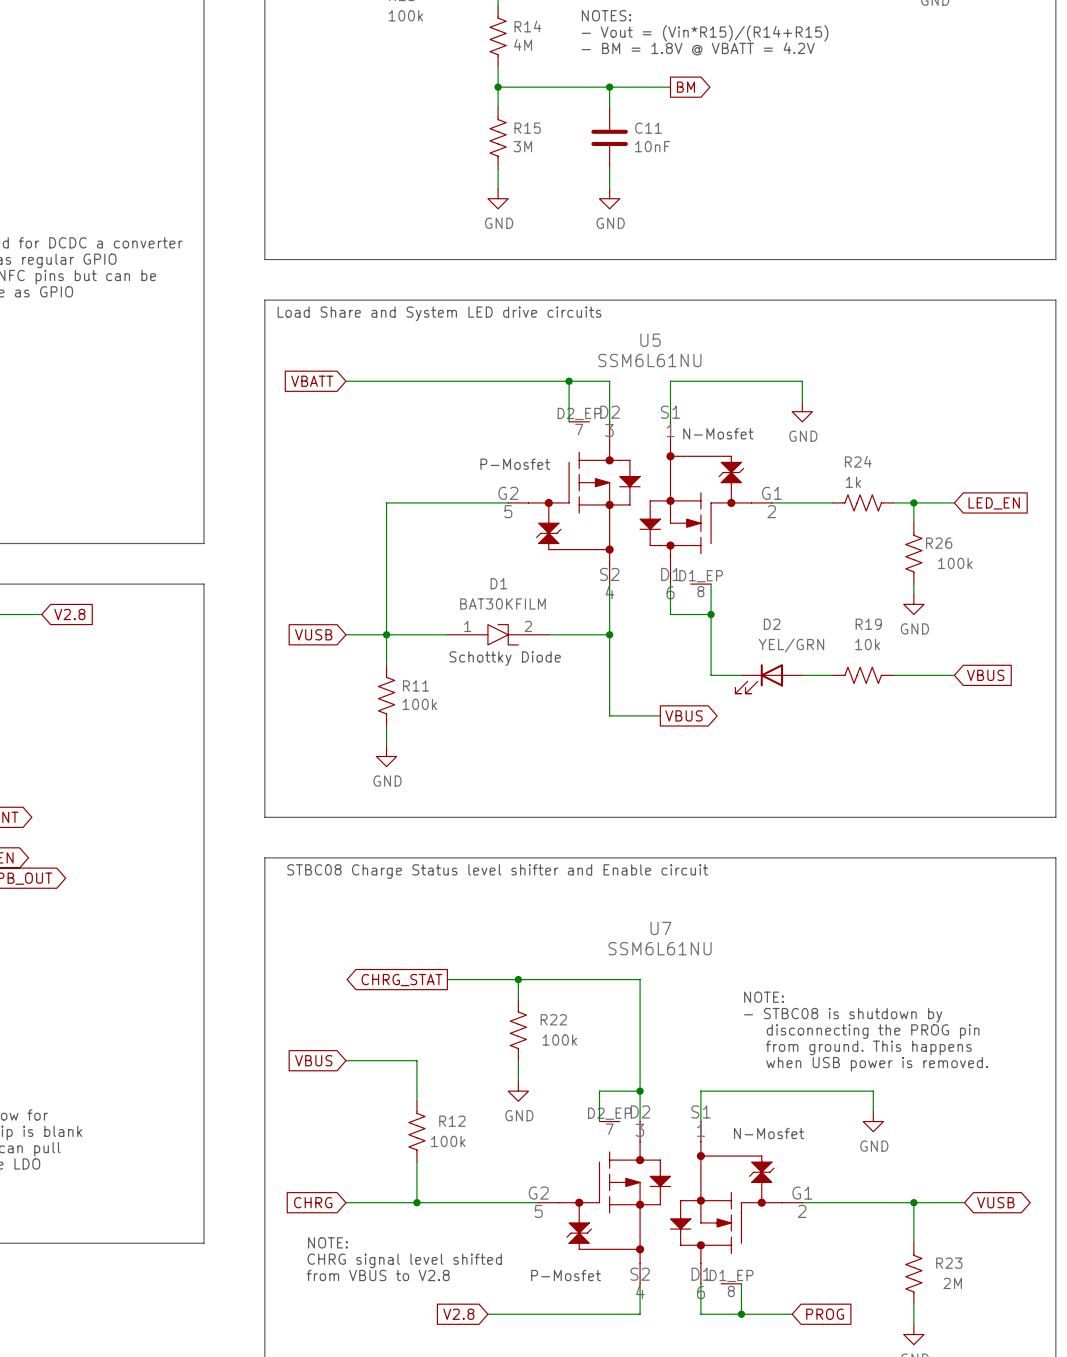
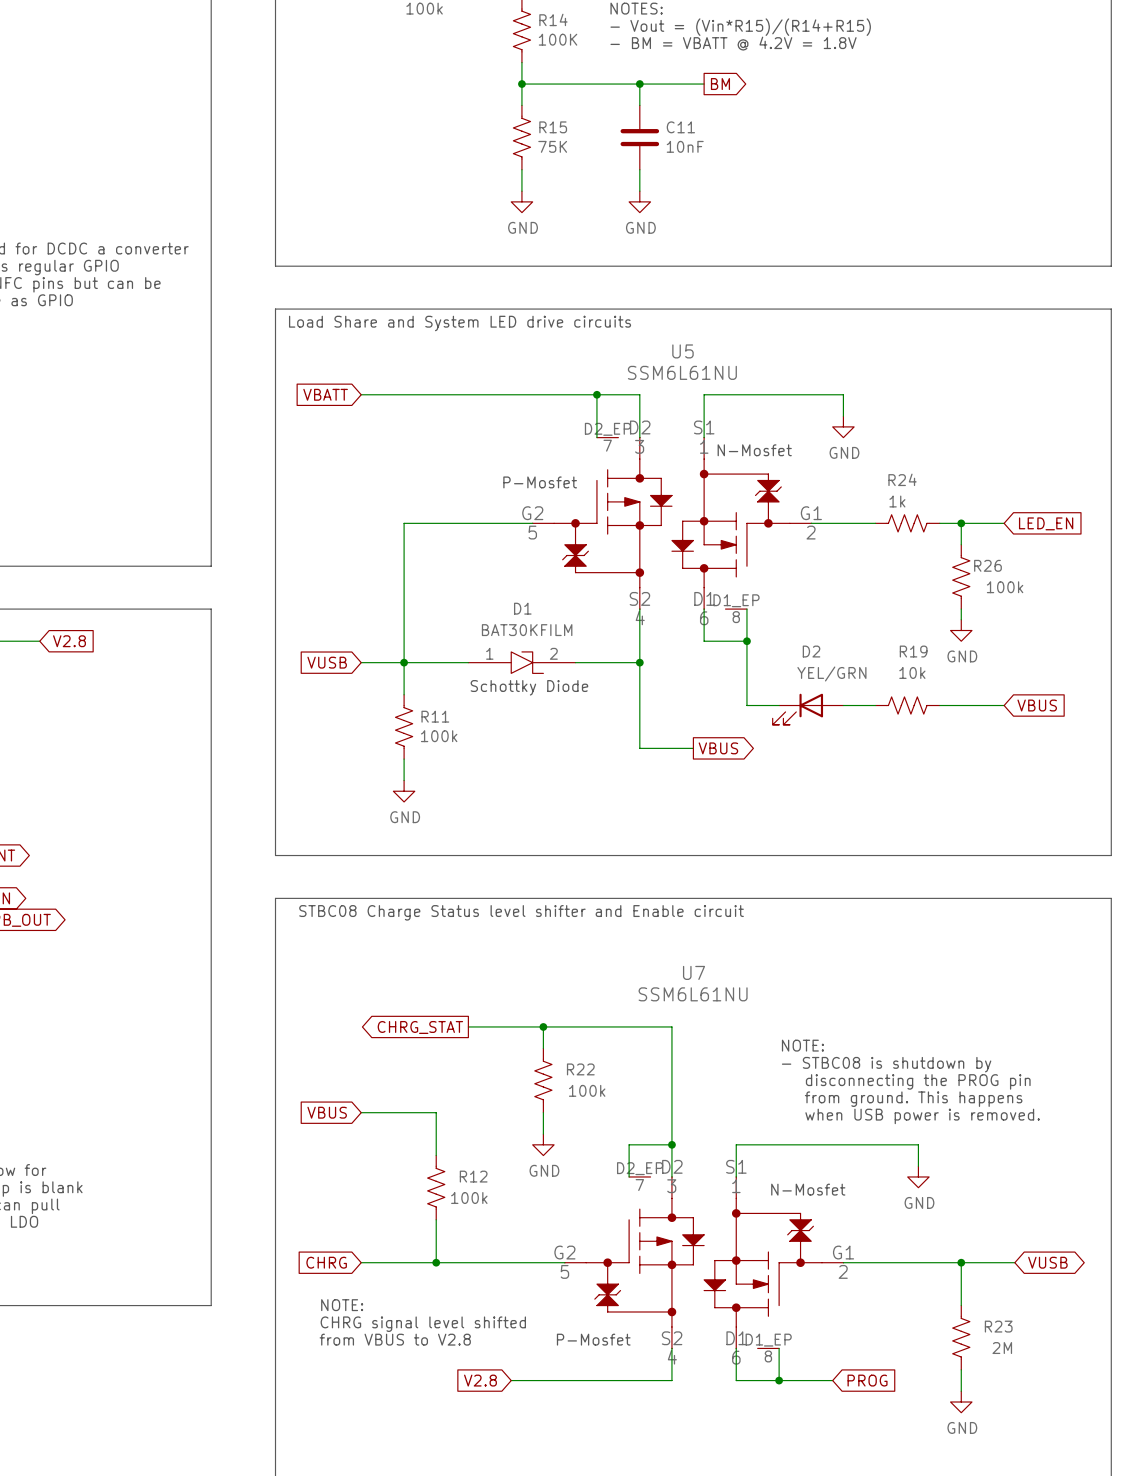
R14 value: 4M (523, 44) -> 100K (558, 39)
text: - BM = 1.8V @ VBATT = 4.2V (698, 48) -> - BM = VBATT @ 4.2V = 1.8V (733, 43)
R15 value: 3M (522, 146) -> 75K (552, 146)

